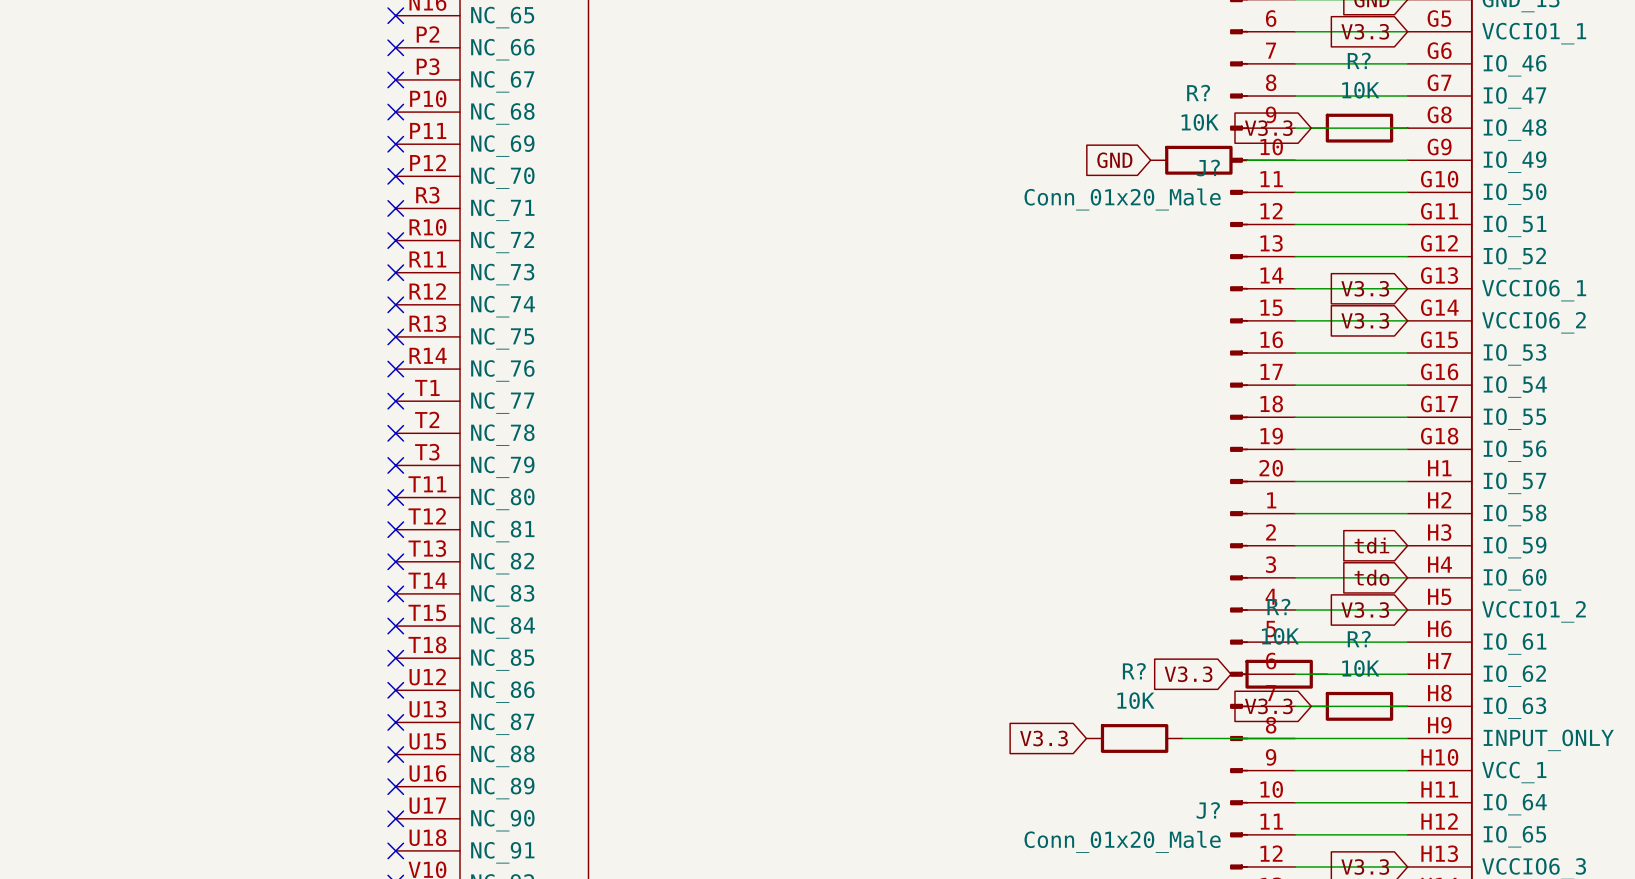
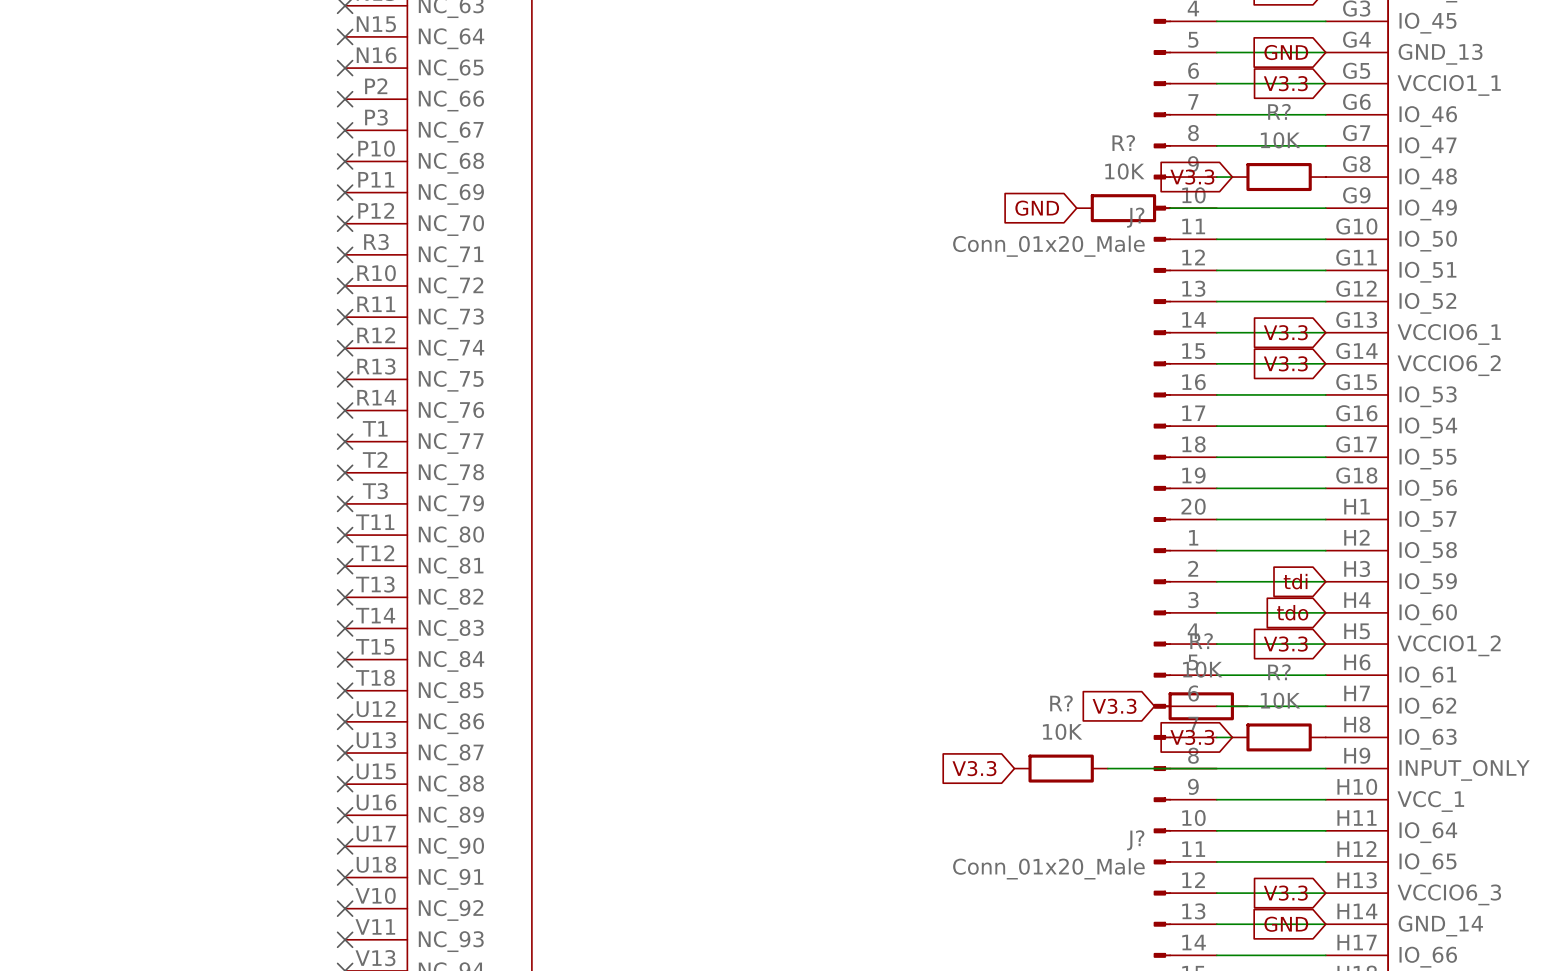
wire: (1311, 128) (1407, 128) -> none
wire: (1311, 706) (1407, 706) -> none

